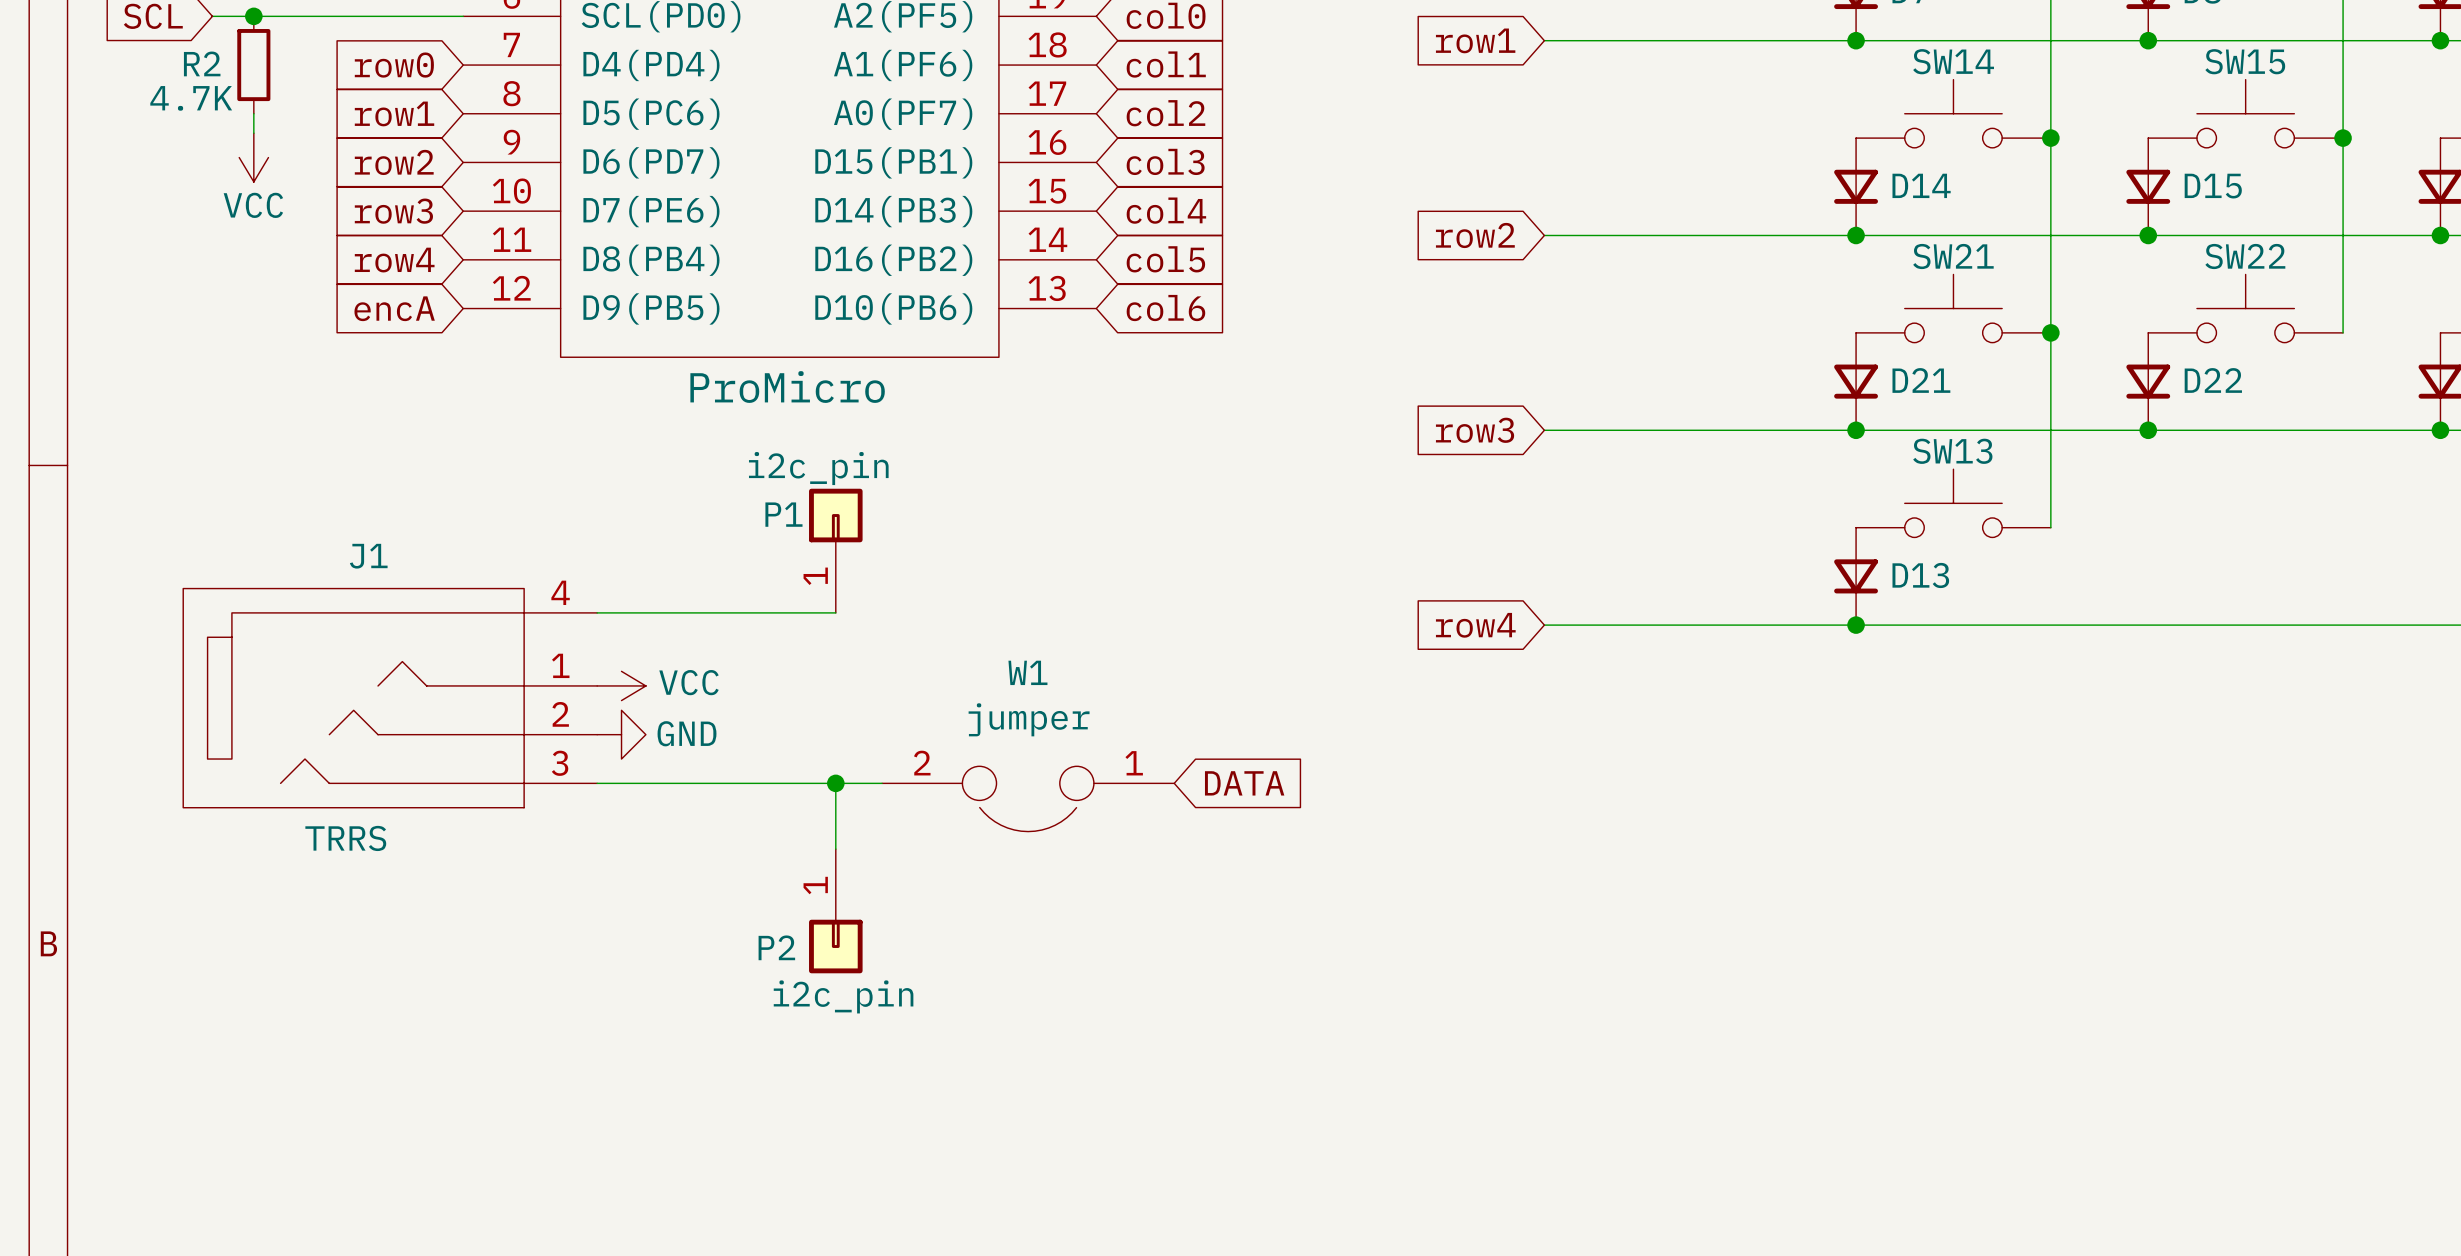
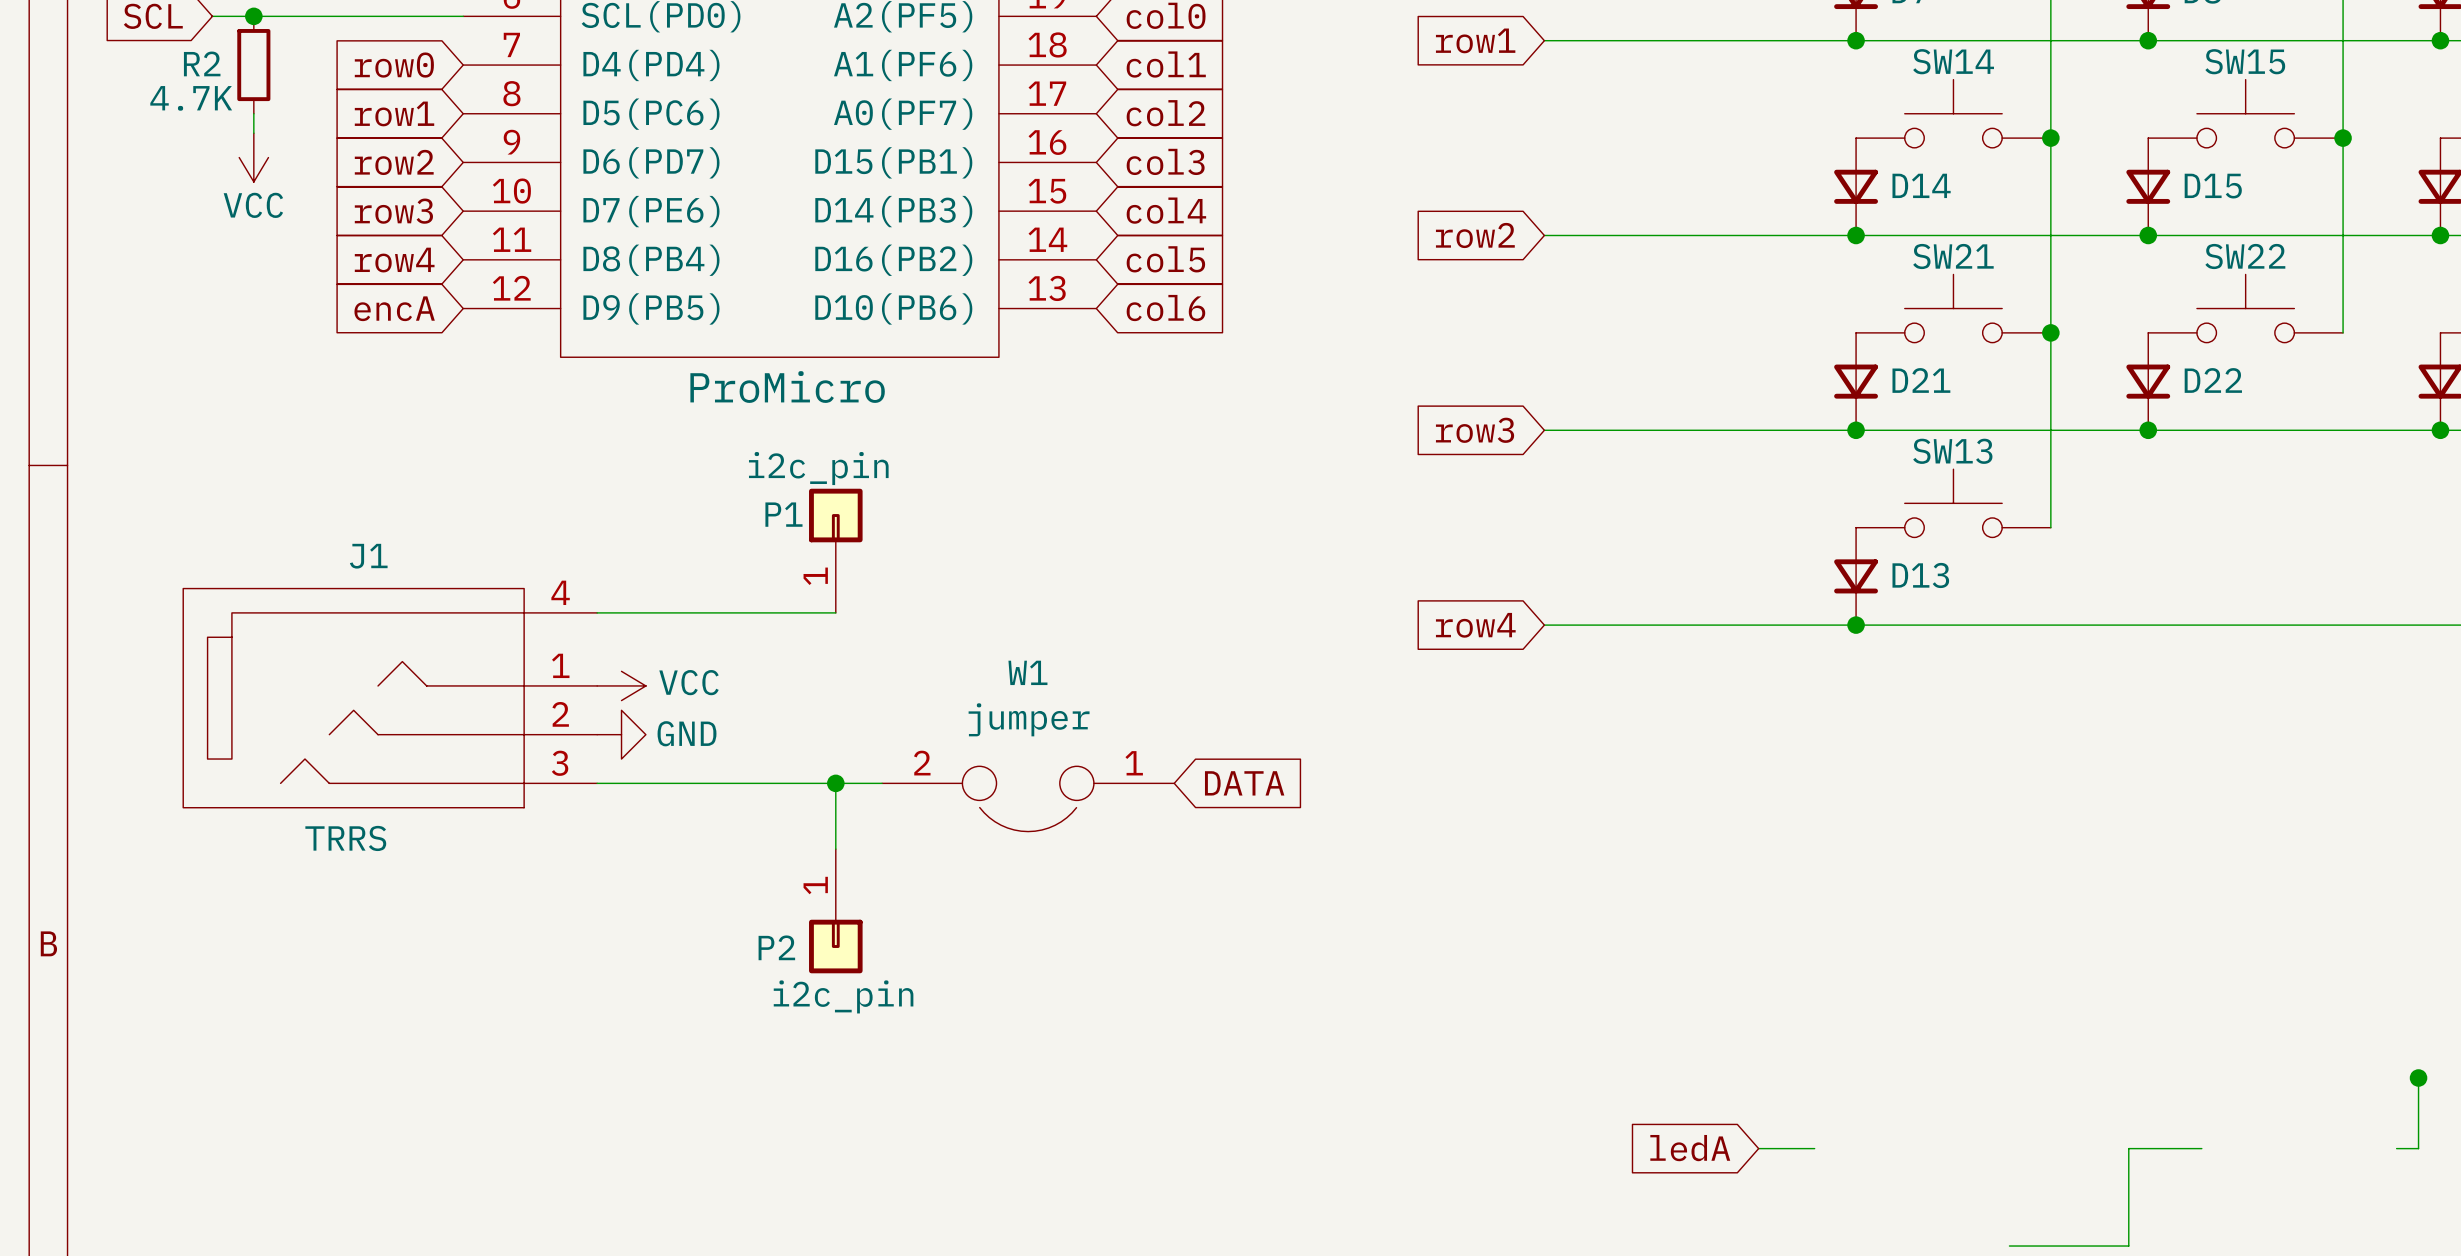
wire: none -> (2418, 1078) (2418, 1148) (2396, 1148)
junction: none -> (2418, 1078)
global label: none -> ledA (1690, 1148)
wire: none -> (1758, 1148) (1814, 1148)
wire: none -> (2201, 1148) (2128, 1148) (2128, 1246) (2009, 1246)

